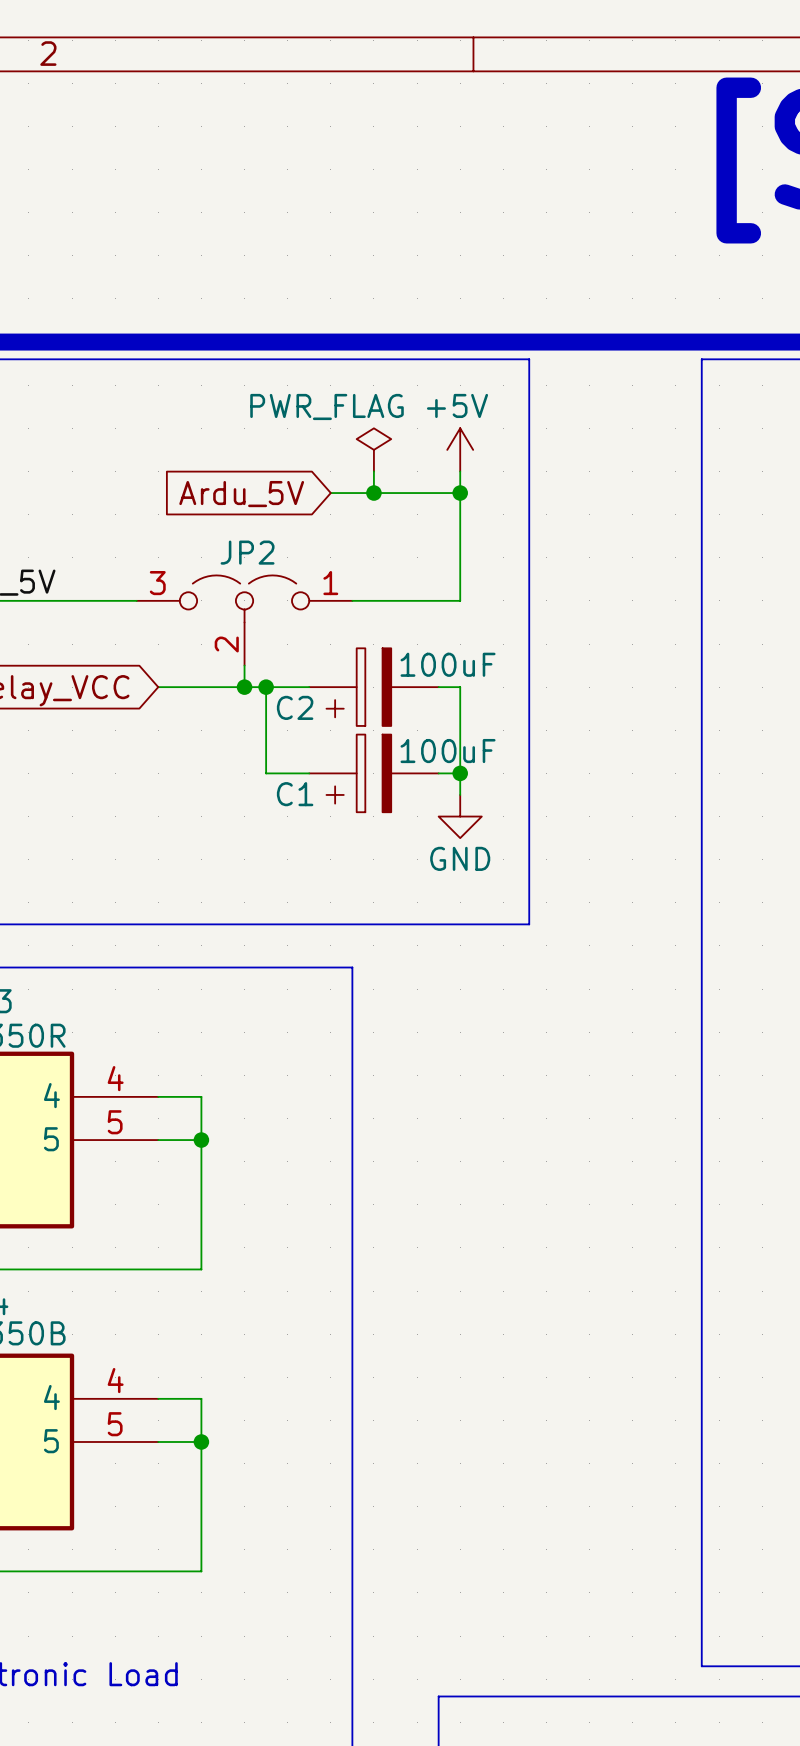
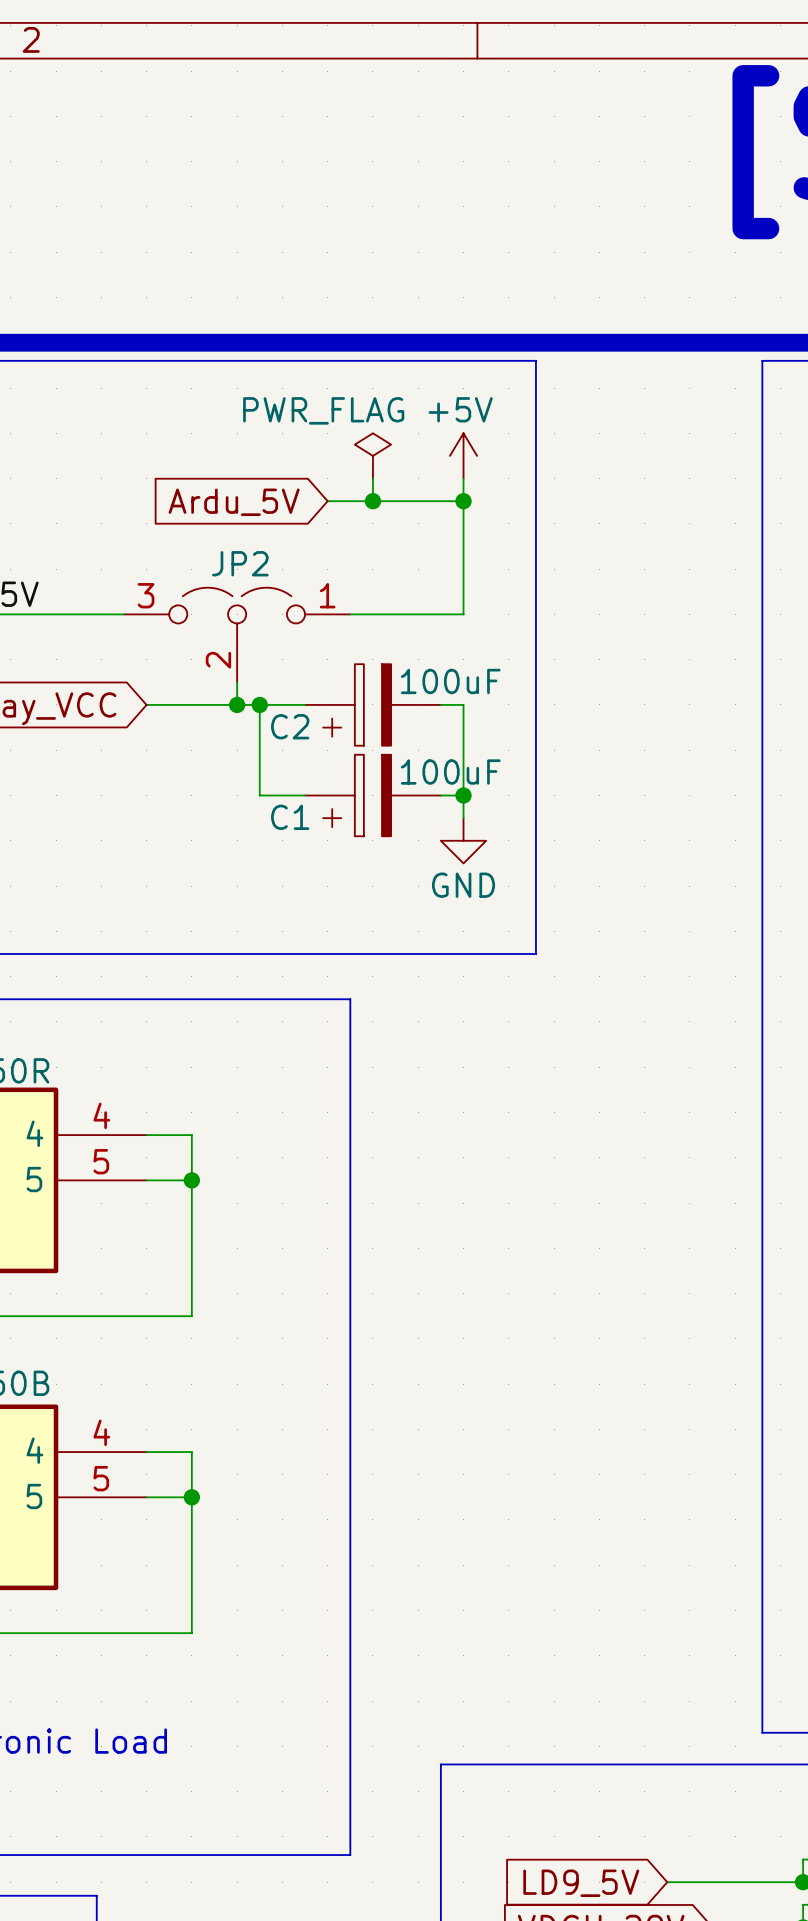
line: (744, 359) (701, 359) (701, 1666) (744, 1666) -> (762, 360) (762, 1732)

